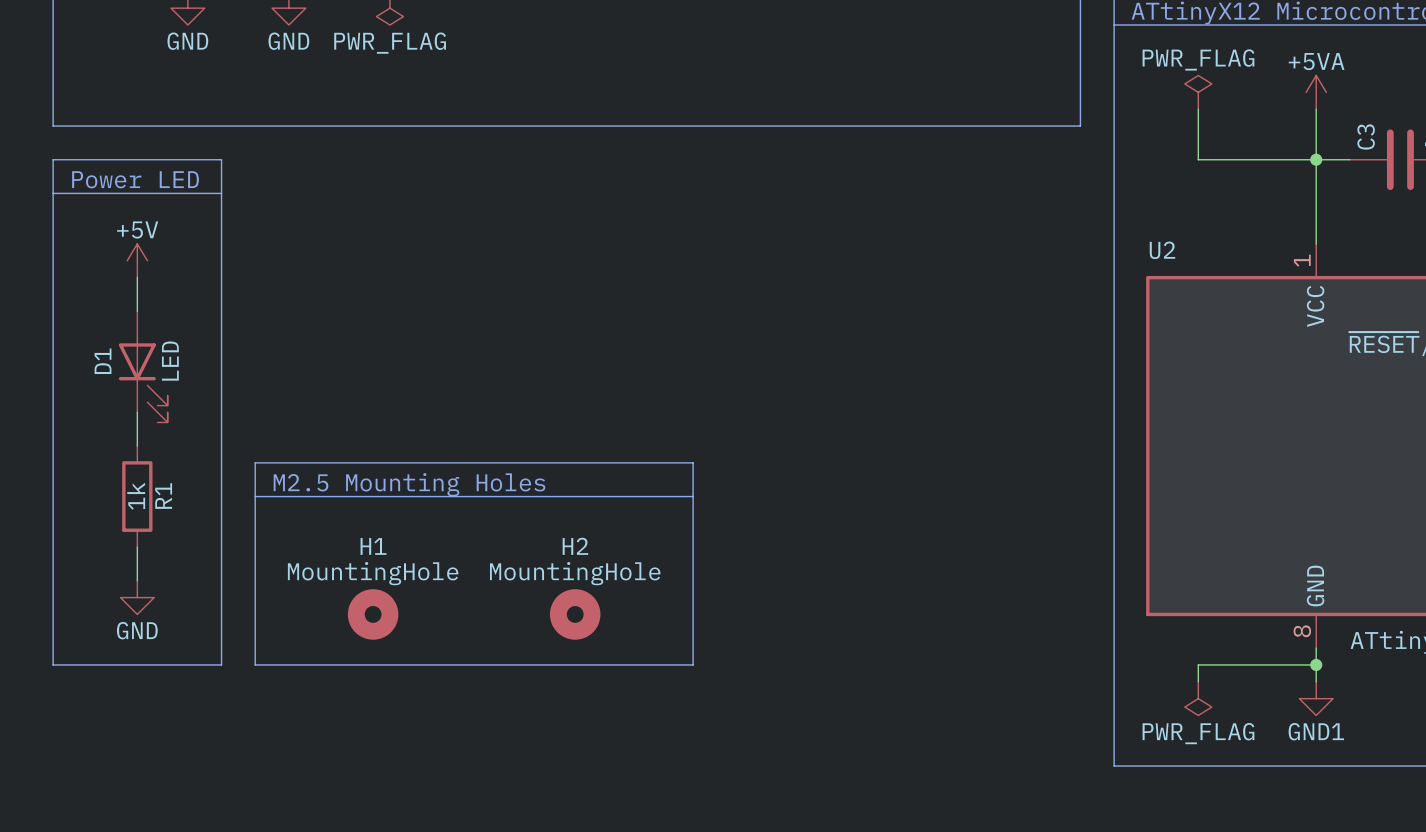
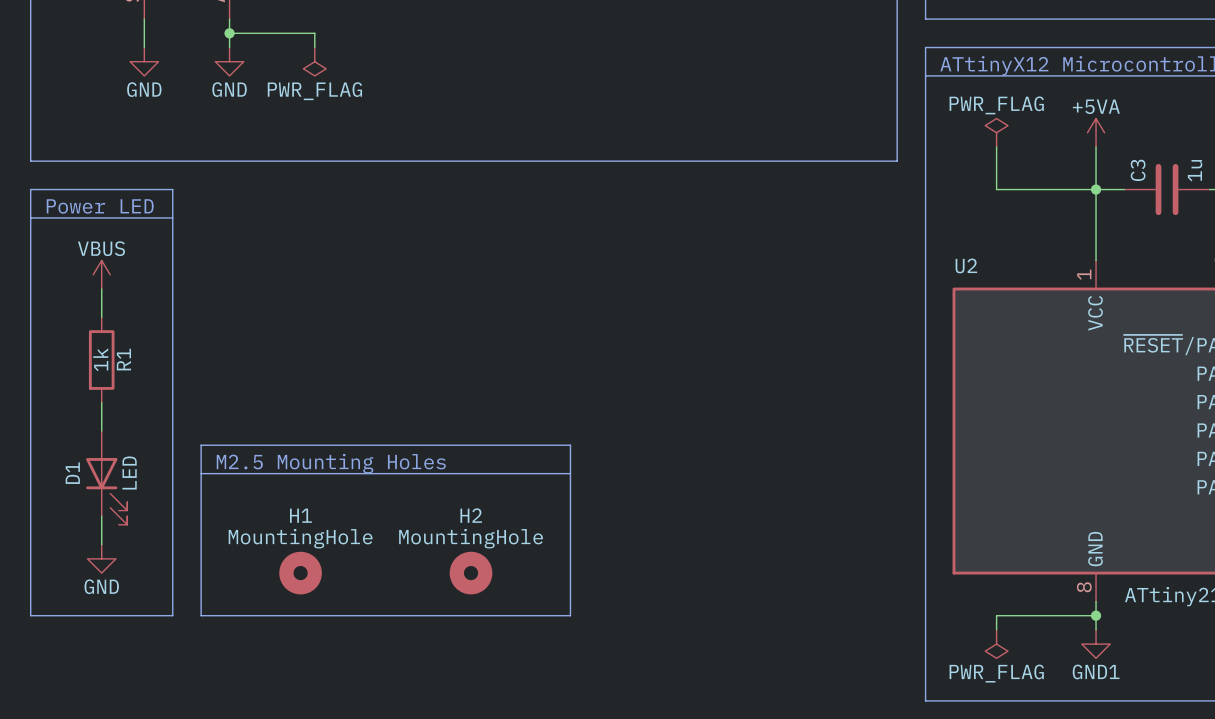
power symbol: +5V (137, 260) -> VBUS (101, 274)
D1 position: (143, 366) -> (106, 477)
R1 position: (137, 496) -> (101, 360)

